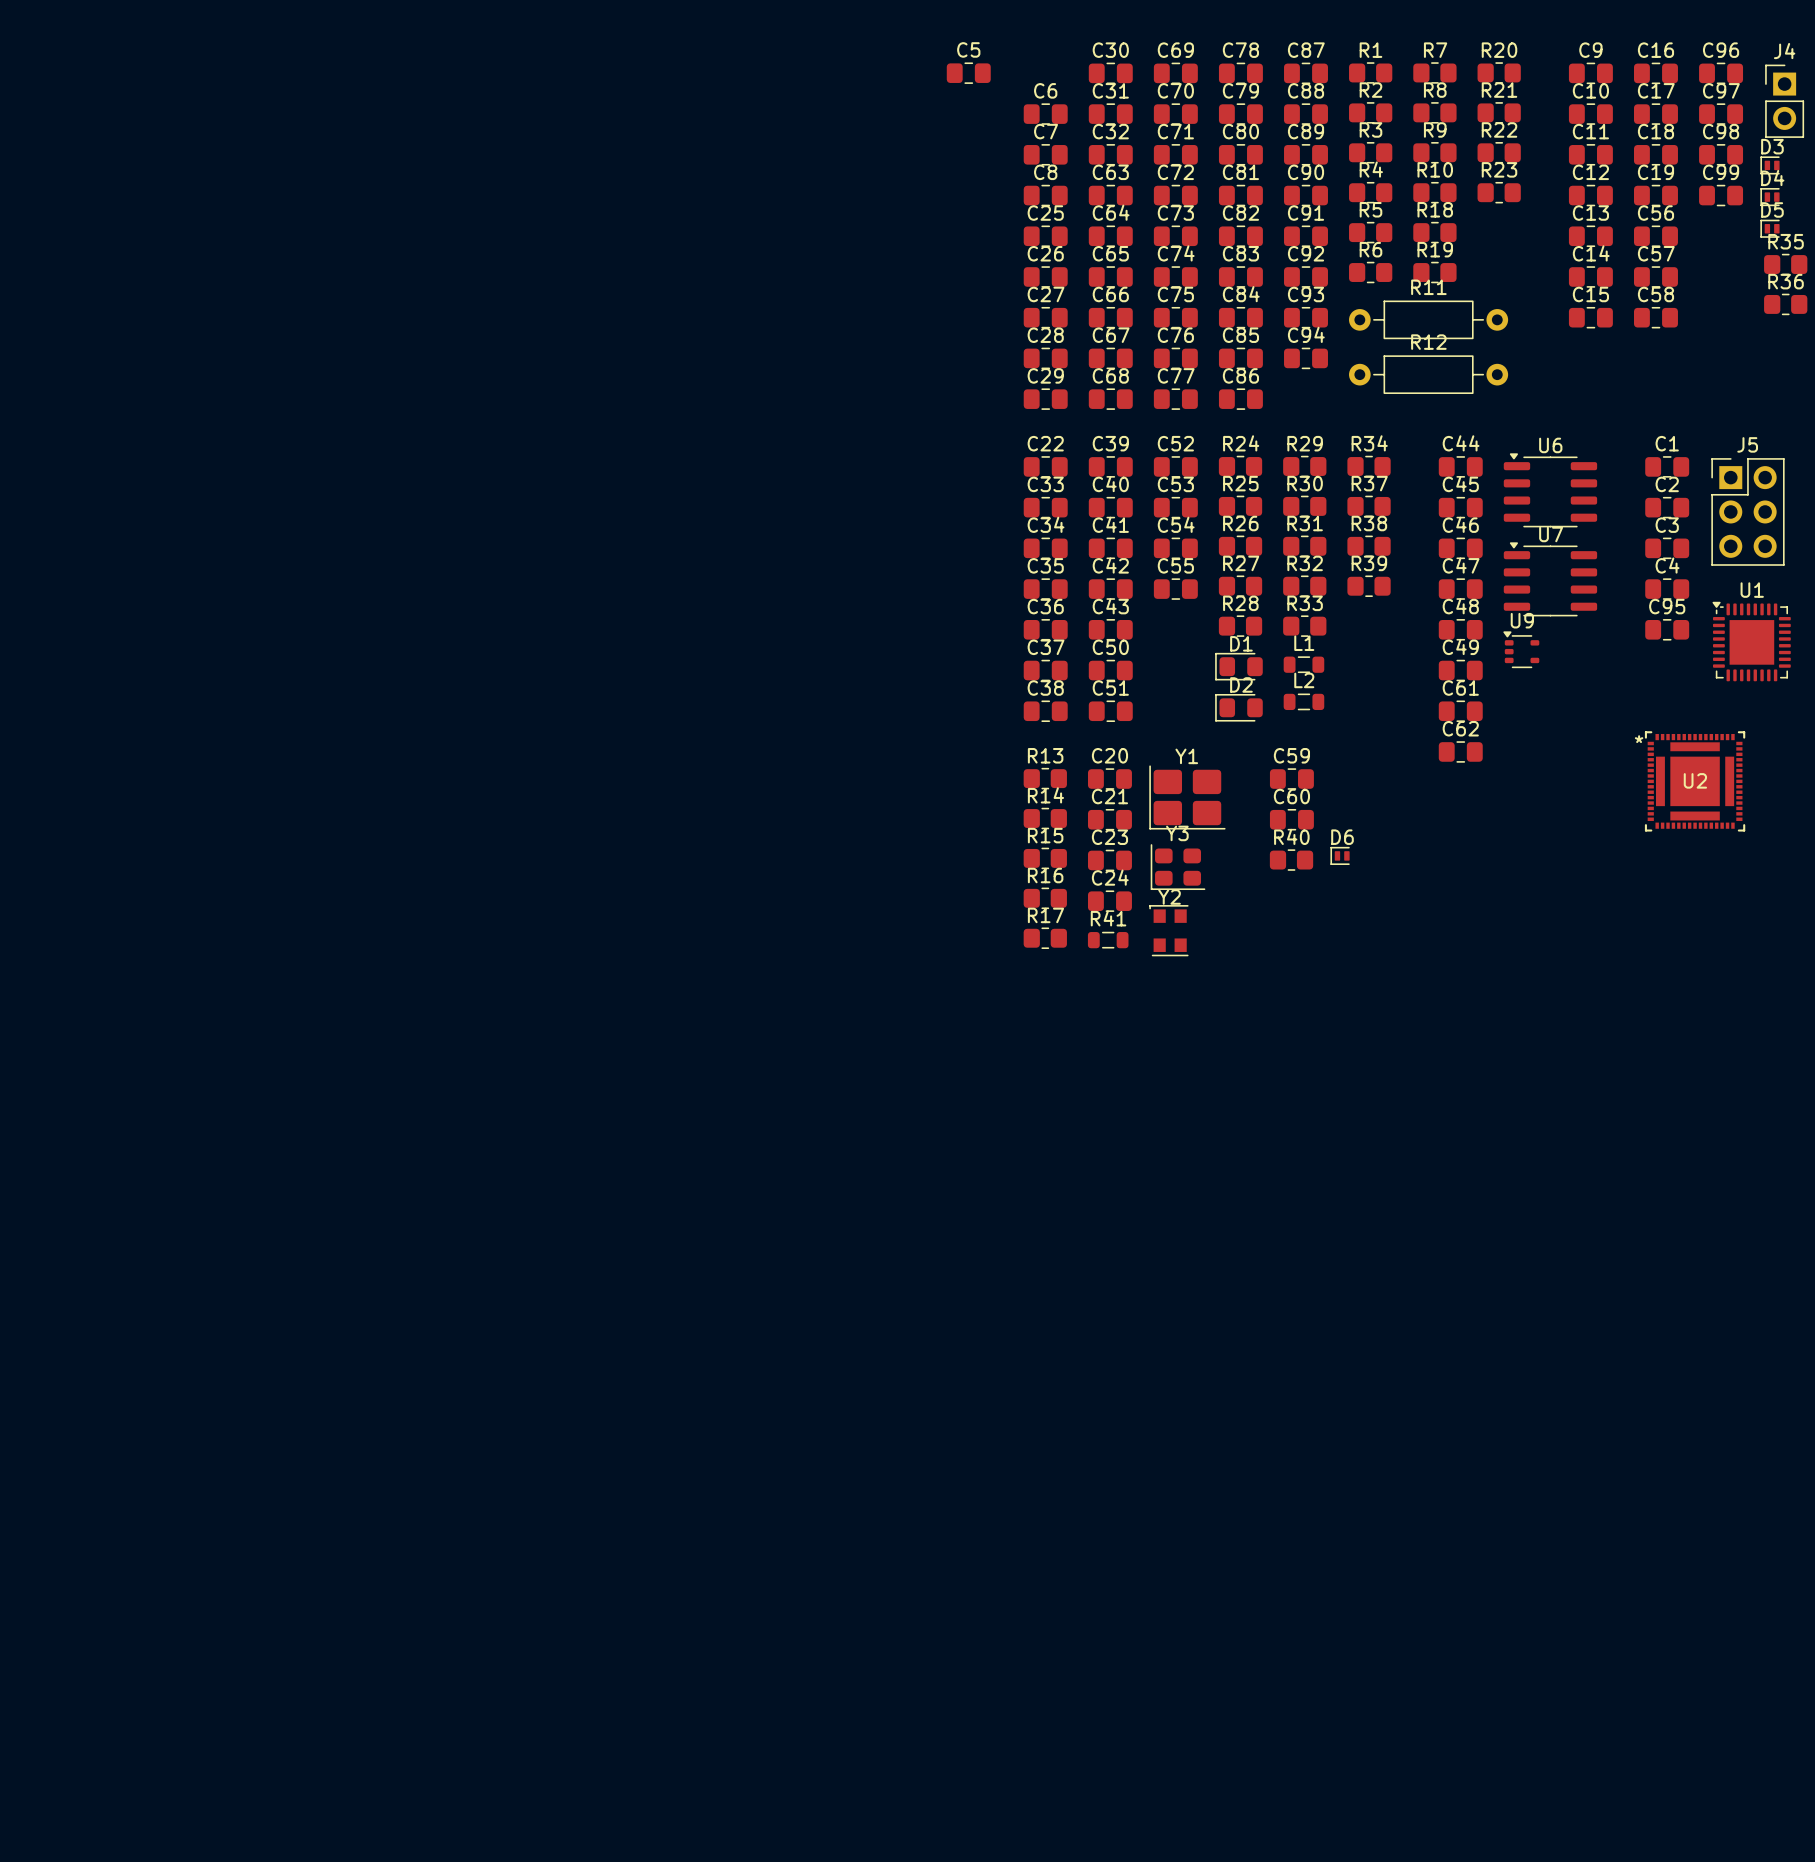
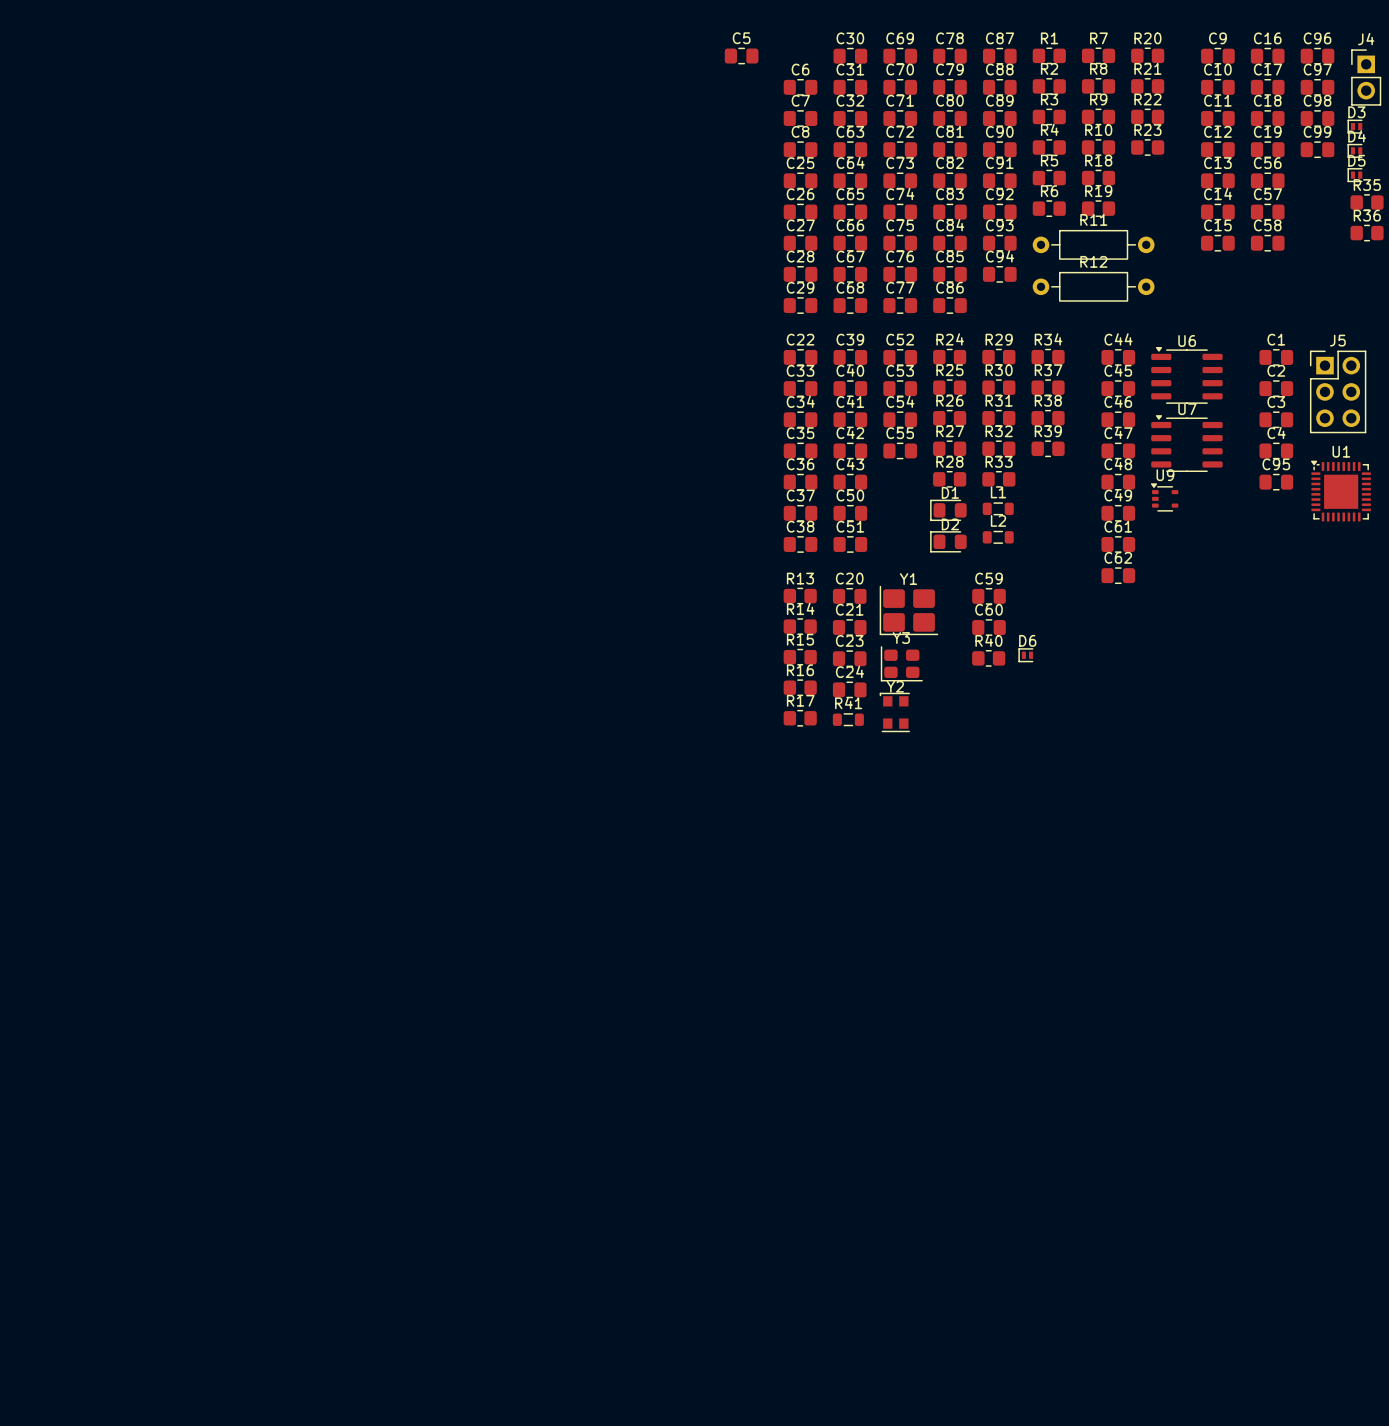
U2: (1695, 781) -> none

